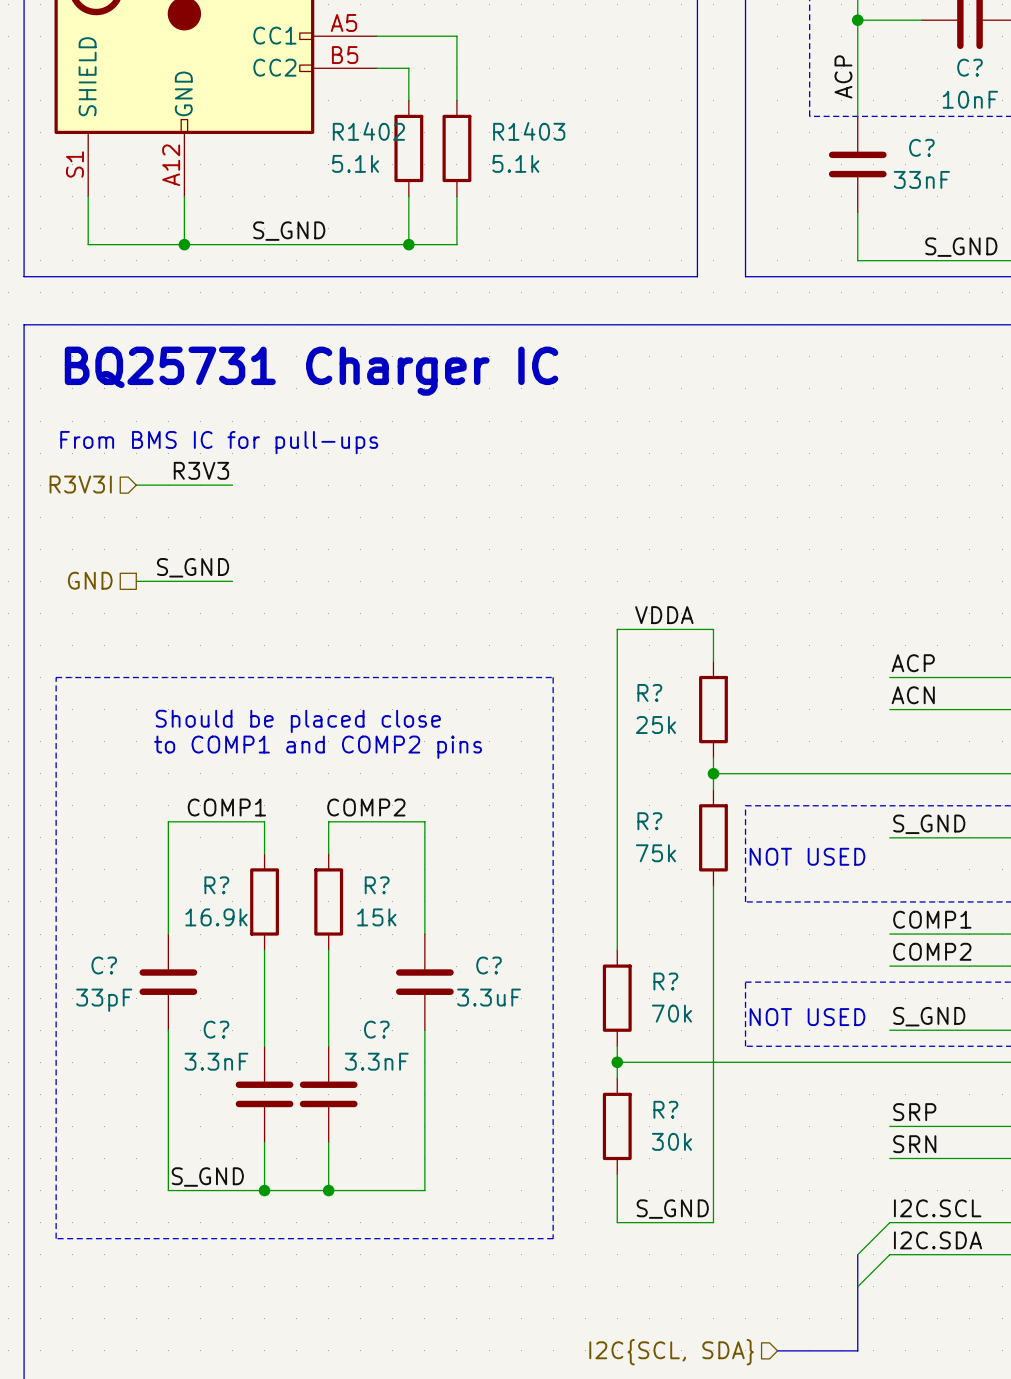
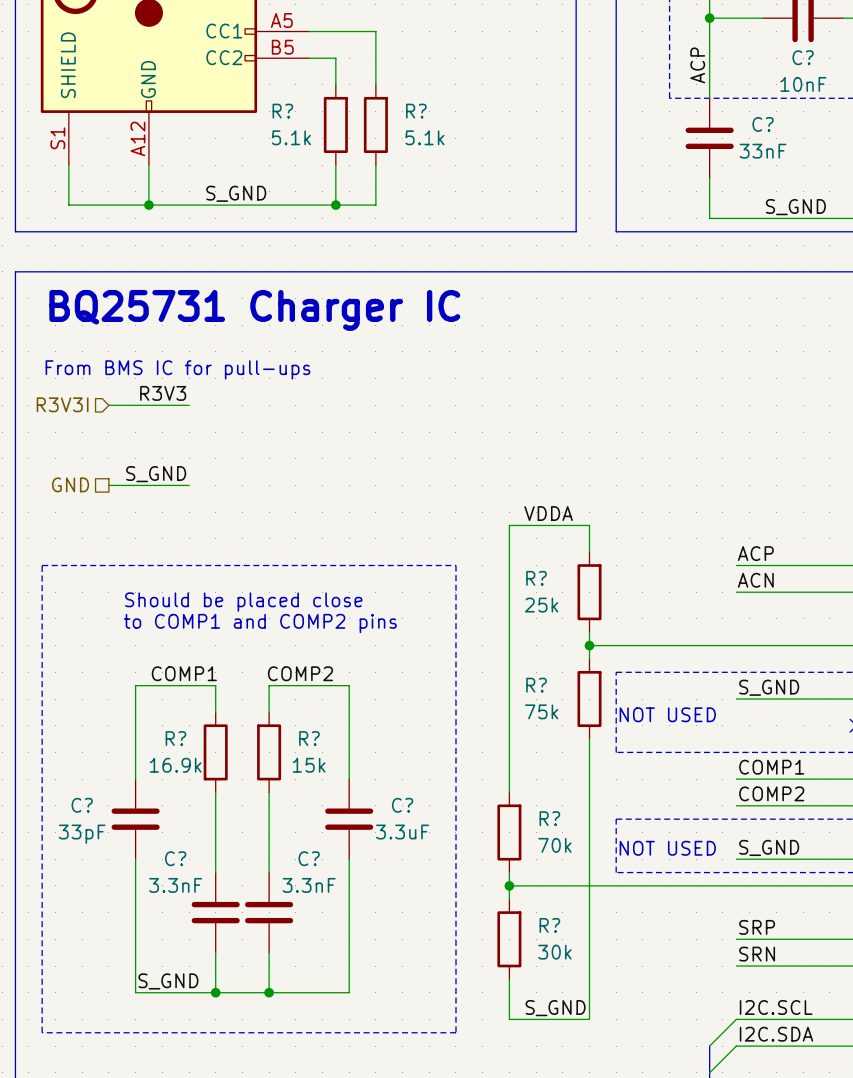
R1402 name: R1402 (368, 131) -> R? (282, 111)
R1403 name: R1403 (529, 131) -> R? (416, 111)

